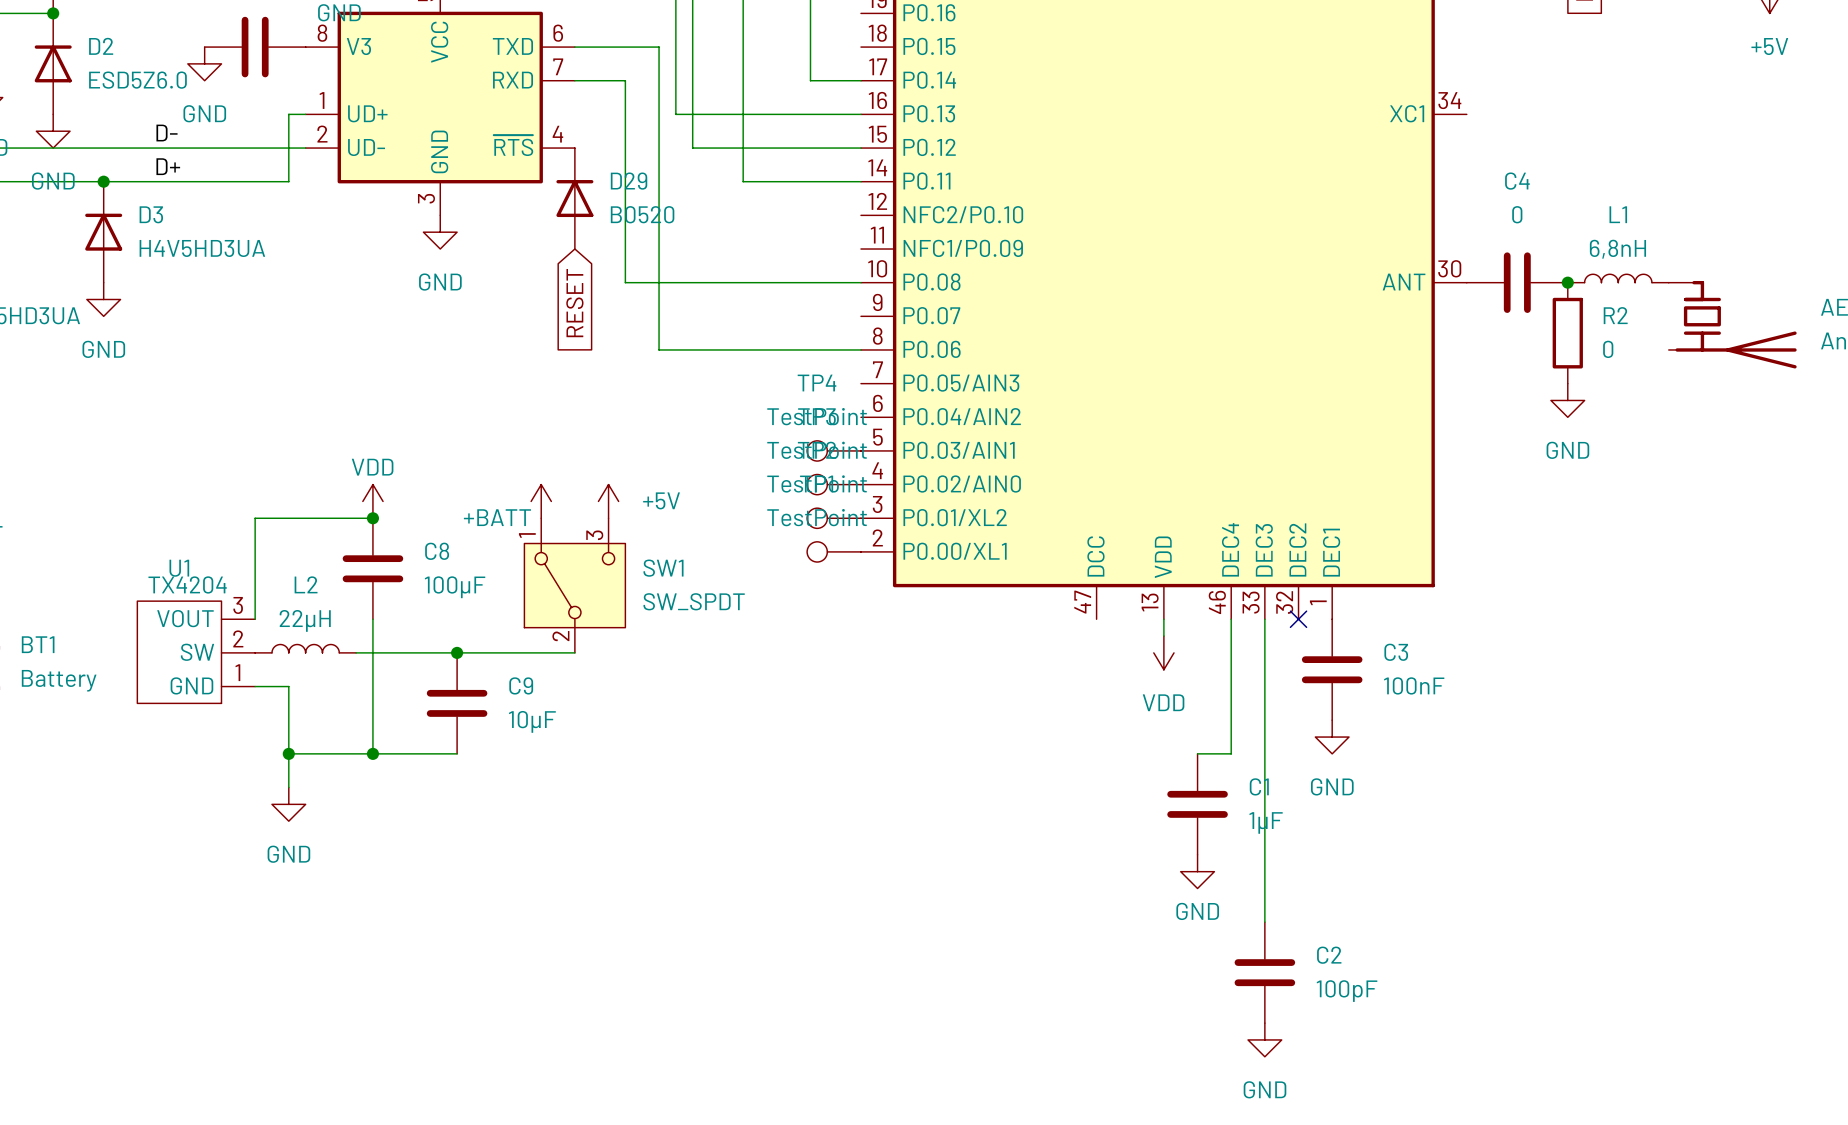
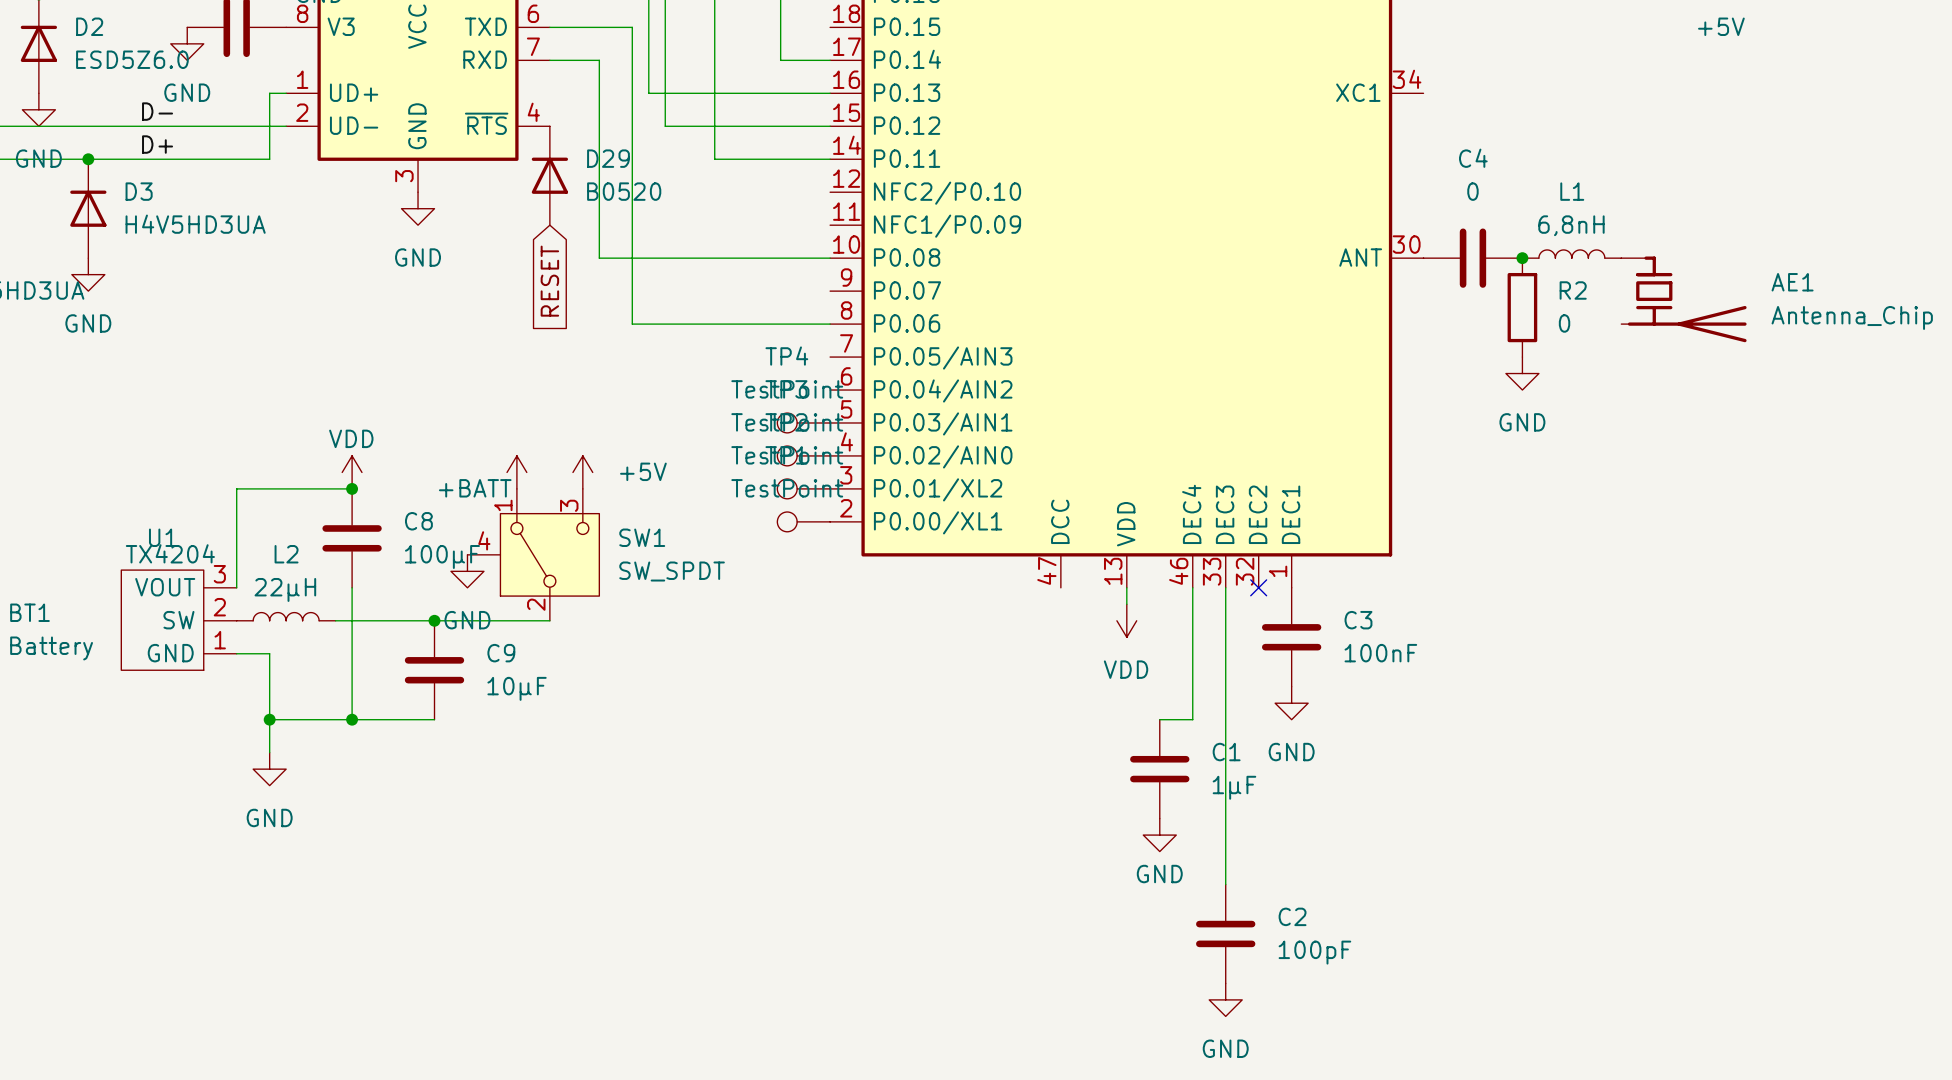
SW1 symbol: [524, 518, 626, 653] -> [467, 488, 600, 621]
power symbol: none -> GND (467, 571)

